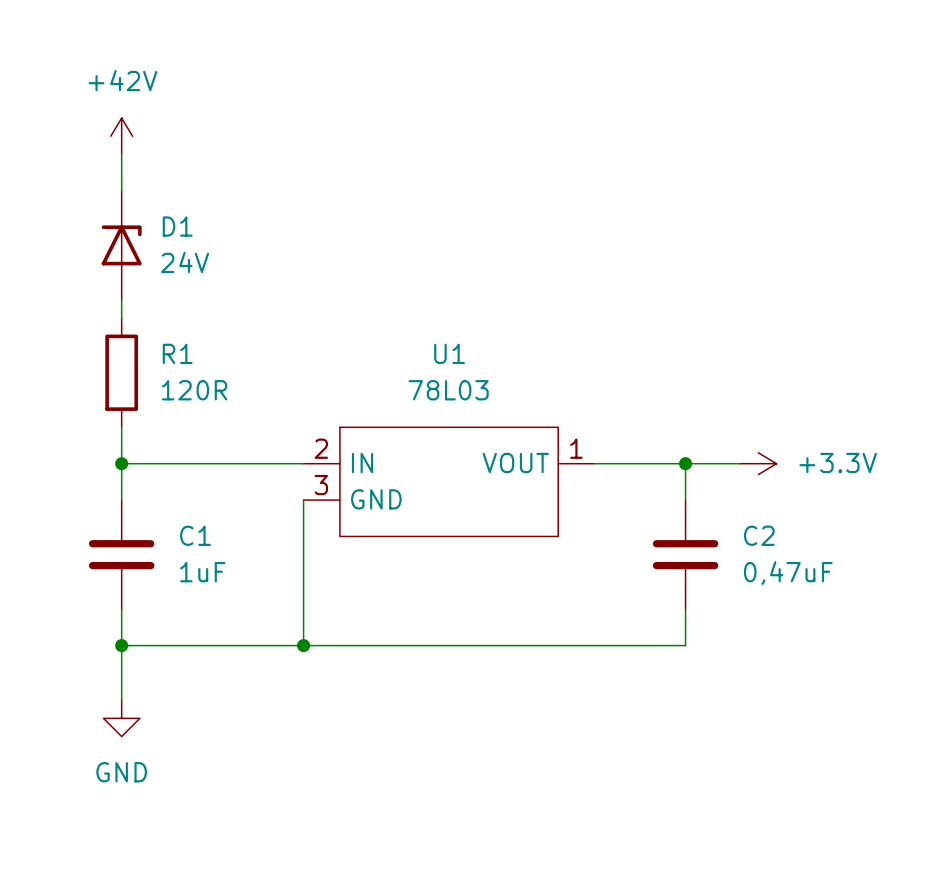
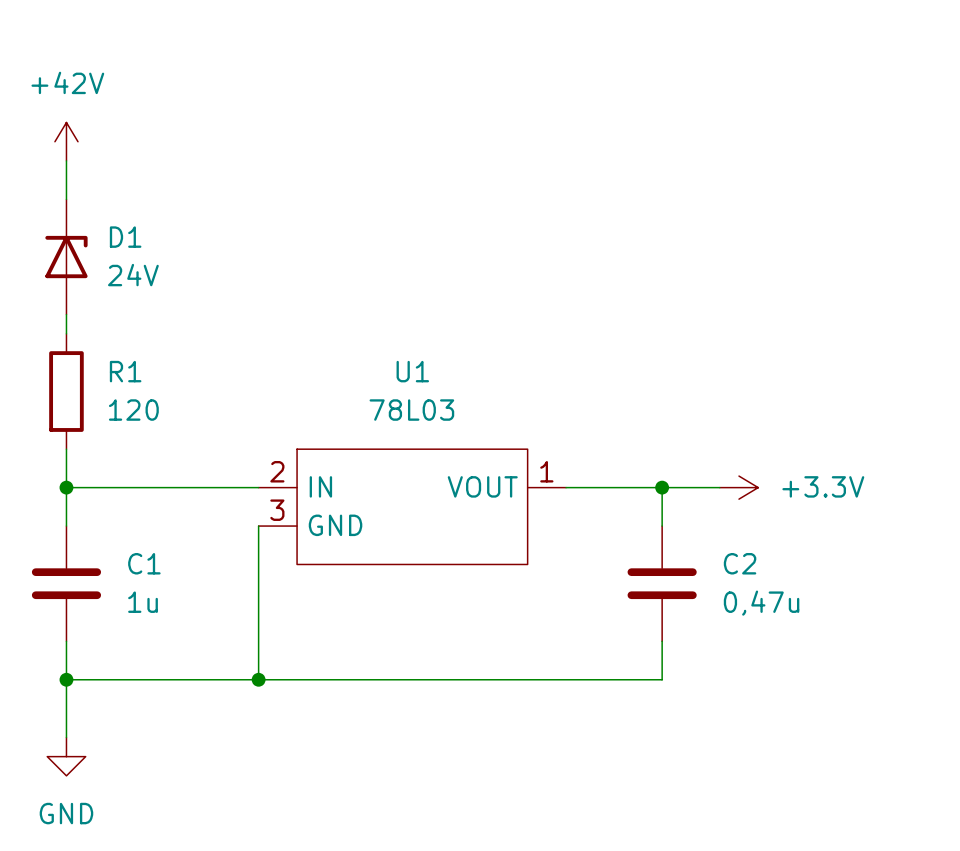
R1 value: 120R (194, 390) -> 120 (133, 410)
C1 value: 1uF (202, 572) -> 1u (143, 602)
C2 value: 0,47uF (788, 573) -> 0,47u (761, 603)

